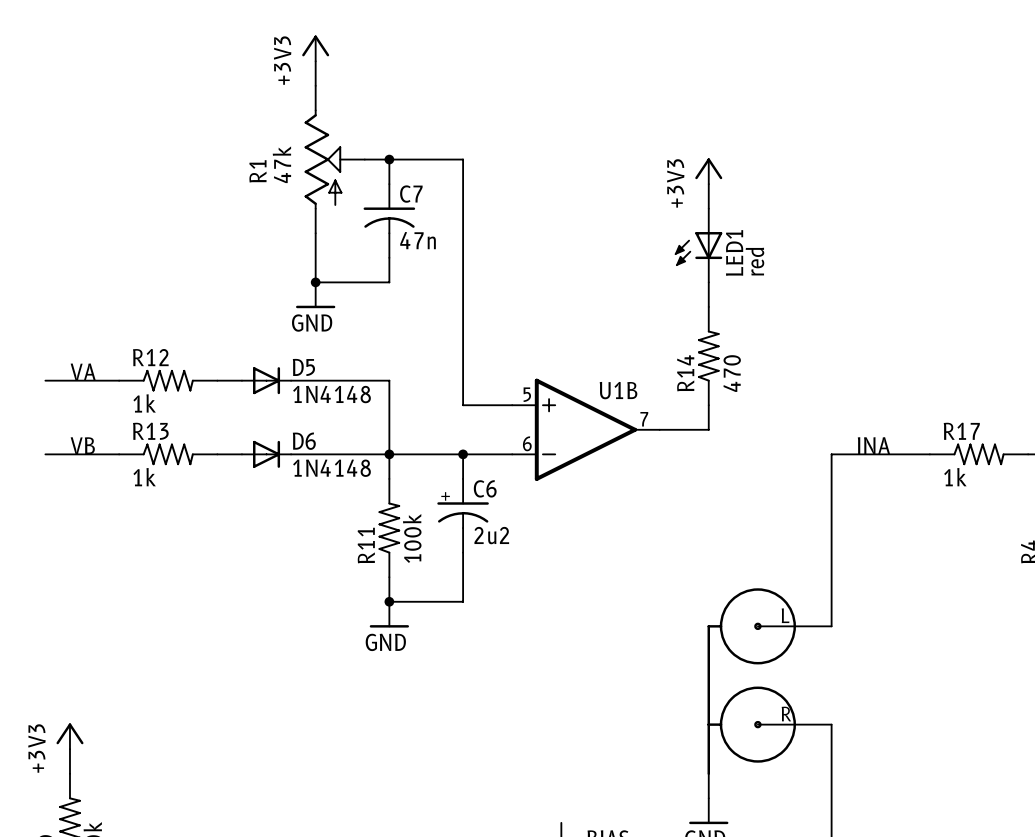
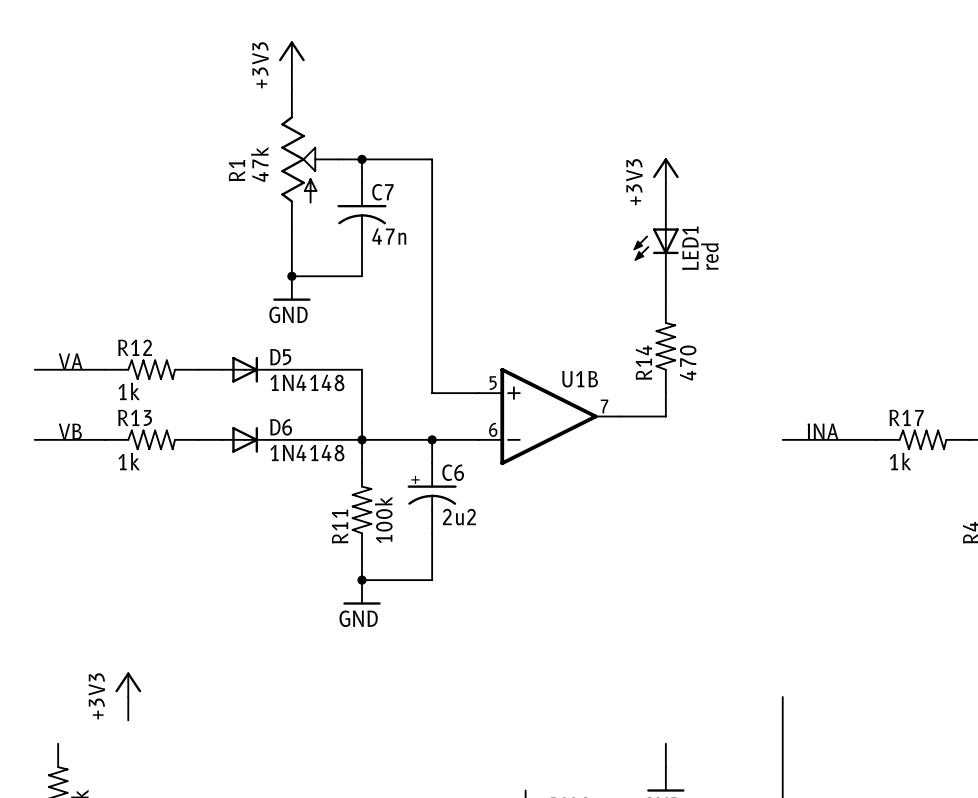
wire: (831, 454) (831, 626) -> none
part: (769, 681) -> none
power symbol position: +3V3 (69, 736) -> +3V3 (128, 684)
wire: (69, 749) (69, 773) -> (128, 696) (128, 720)

